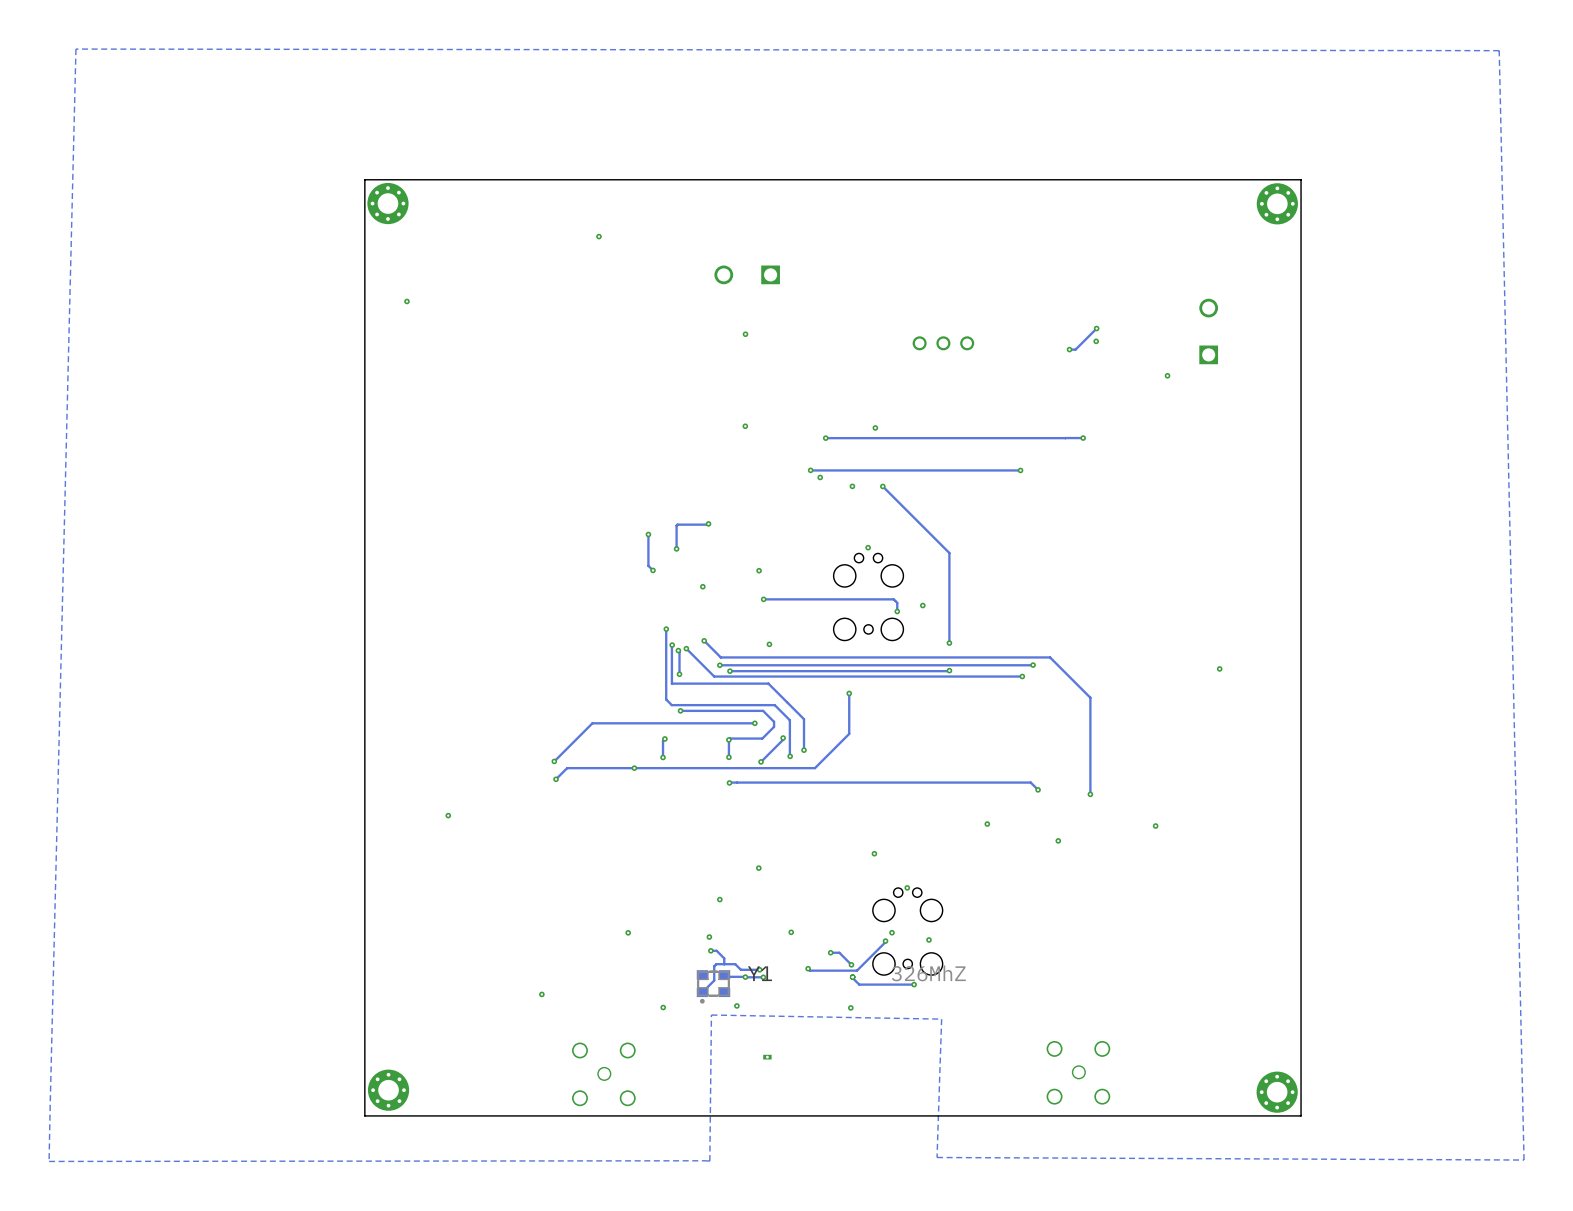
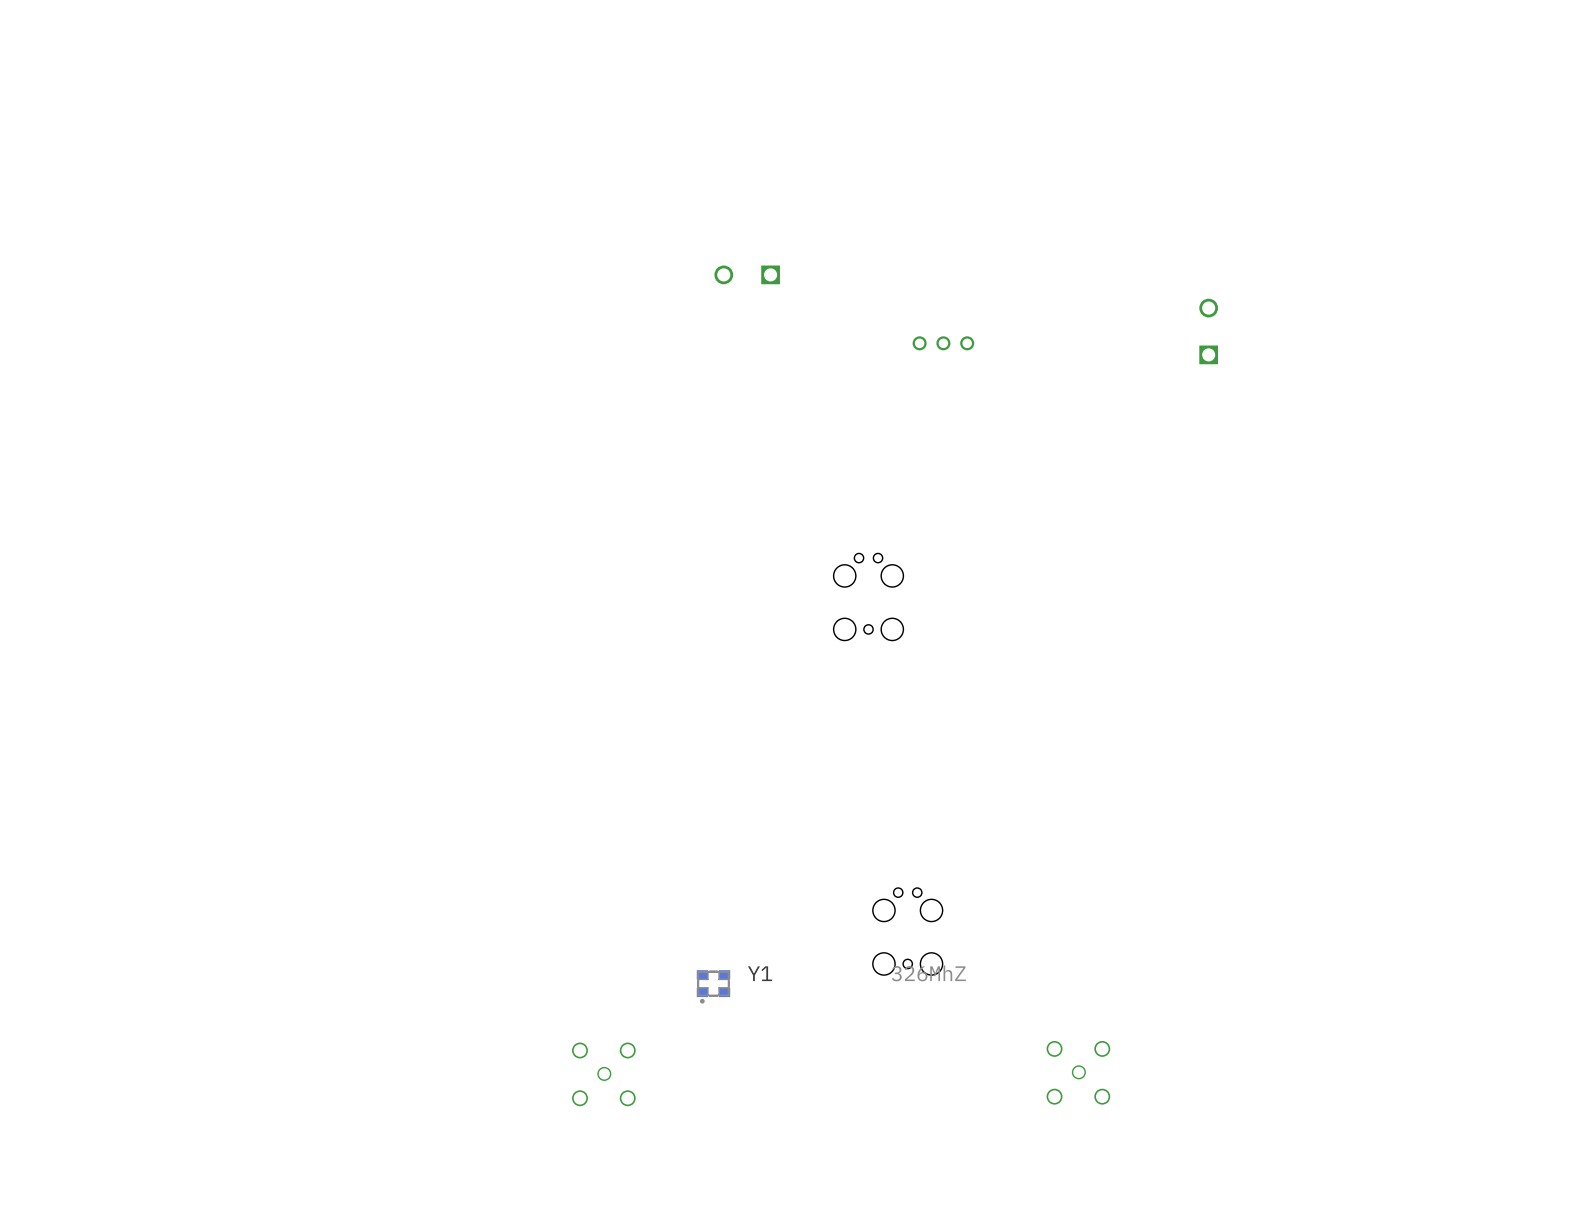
zone outline: (75, 49) (1499, 50) (1524, 1160) (937, 1157) (941, 1019) (711, 1015) (709, 1161) (49, 1161) (75, 49) -> none
board edge: (1301, 179) (364, 179) (364, 1115) (1301, 1115) (1301, 179) -> none
part: (387, 203) -> none
part: (1277, 203) -> none
via: (598, 236) -> none
via: (406, 301) -> none
track: (1096, 328) (1075, 349) (1069, 349) -> none
via: (1096, 328) -> none
via: (745, 334) -> none
via: (1096, 341) -> none
via: (1069, 349) -> none
via: (1167, 375) -> none
via: (745, 426) -> none
via: (875, 427) -> none
via: (825, 438) -> none
track: (1065, 438) (825, 438) -> none
track: (1083, 438) (1065, 438) -> none
via: (1083, 438) -> none
via: (810, 470) -> none
track: (1020, 470) (810, 470) -> none
via: (1020, 470) -> none
via: (820, 477) -> none
via: (852, 486) -> none
track: (882, 486) (949, 553) (949, 643) -> none
via: (882, 486) -> none
track: (708, 523) (677, 524) (676, 548) -> none
via: (708, 523) -> none
track: (648, 534) (648, 565) (653, 570) -> none
via: (648, 534) -> none
via: (868, 547) -> none
via: (676, 548) -> none
via: (653, 570) -> none
via: (759, 570) -> none
via: (702, 586) -> none
track: (763, 599) (893, 599) (897, 602) (897, 611) -> none
via: (763, 599) -> none
via: (922, 605) -> none
via: (897, 611) -> none
track: (666, 629) (666, 699) (671, 705) (774, 705) (789, 720) (790, 756) -> none
via: (666, 629) -> none
track: (704, 640) (720, 657) (1050, 657) (1090, 697) (1090, 794) -> none
via: (704, 640) -> none
via: (949, 643) -> none
via: (769, 644) -> none
track: (672, 645) (671, 683) (768, 683) (804, 719) (804, 750) -> none
via: (672, 645) -> none
track: (686, 648) (714, 676) (1022, 676) -> none
via: (686, 648) -> none
track: (678, 650) (679, 674) -> none
via: (678, 650) -> none
via: (719, 665) -> none
track: (1033, 665) (719, 665) -> none
via: (1033, 665) -> none
via: (1219, 668) -> none
track: (949, 670) (729, 671) -> none
via: (949, 670) -> none
via: (729, 671) -> none
via: (679, 674) -> none
via: (1022, 676) -> none
track: (849, 693) (849, 733) (814, 768) (567, 768) (556, 779) -> none
via: (849, 693) -> none
track: (680, 710) (763, 710) (774, 721) (774, 726) (762, 738) (728, 739) -> none
via: (680, 710) -> none
track: (754, 723) (592, 723) (554, 761) -> none
via: (754, 723) -> none
track: (664, 738) (663, 740) (663, 757) -> none
via: (664, 738) -> none
track: (783, 738) (761, 761) -> none
via: (783, 738) -> none
track: (728, 739) (728, 757) -> none
via: (728, 739) -> none
via: (804, 750) -> none
via: (790, 756) -> none
via: (663, 757) -> none
via: (728, 757) -> none
via: (554, 761) -> none
via: (761, 761) -> none
via: (634, 768) -> none
via: (556, 779) -> none
track: (729, 782) (1030, 782) (1038, 789) -> none
via: (729, 782) -> none
via: (1038, 789) -> none
via: (1090, 794) -> none
via: (448, 815) -> none
via: (987, 824) -> none
via: (1155, 826) -> none
via: (1058, 840) -> none
via: (874, 853) -> none
via: (758, 868) -> none
via: (907, 887) -> none
via: (719, 899) -> none
via: (628, 932) -> none
via: (791, 932) -> none
via: (892, 932) -> none
via: (709, 937) -> none
via: (928, 939) -> none
track: (885, 941) (857, 970) (810, 970) (808, 968) -> none
via: (885, 941) -> none
track: (710, 950) (716, 950) (724, 958) (724, 964) -> none
via: (710, 950) -> none
track: (830, 952) (839, 952) (851, 964) -> none
via: (830, 952) -> none
via: (851, 964) -> none
via: (808, 968) -> none
track: (759, 969) (740, 969) (735, 964) (716, 964) (714, 966) (714, 980) (702, 992) -> none
via: (759, 969) -> none
track: (724, 974) (726, 976) (763, 977) -> none
via: (745, 977) -> none
via: (763, 977) -> none
track: (852, 977) (859, 984) (914, 984) -> none
via: (852, 977) -> none
via: (914, 984) -> none
via: (541, 994) -> none
via: (736, 1005) -> none
via: (663, 1007) -> none
via: (850, 1007) -> none
part: (767, 1057) -> none
part: (388, 1090) -> none
part: (1277, 1092) -> none

